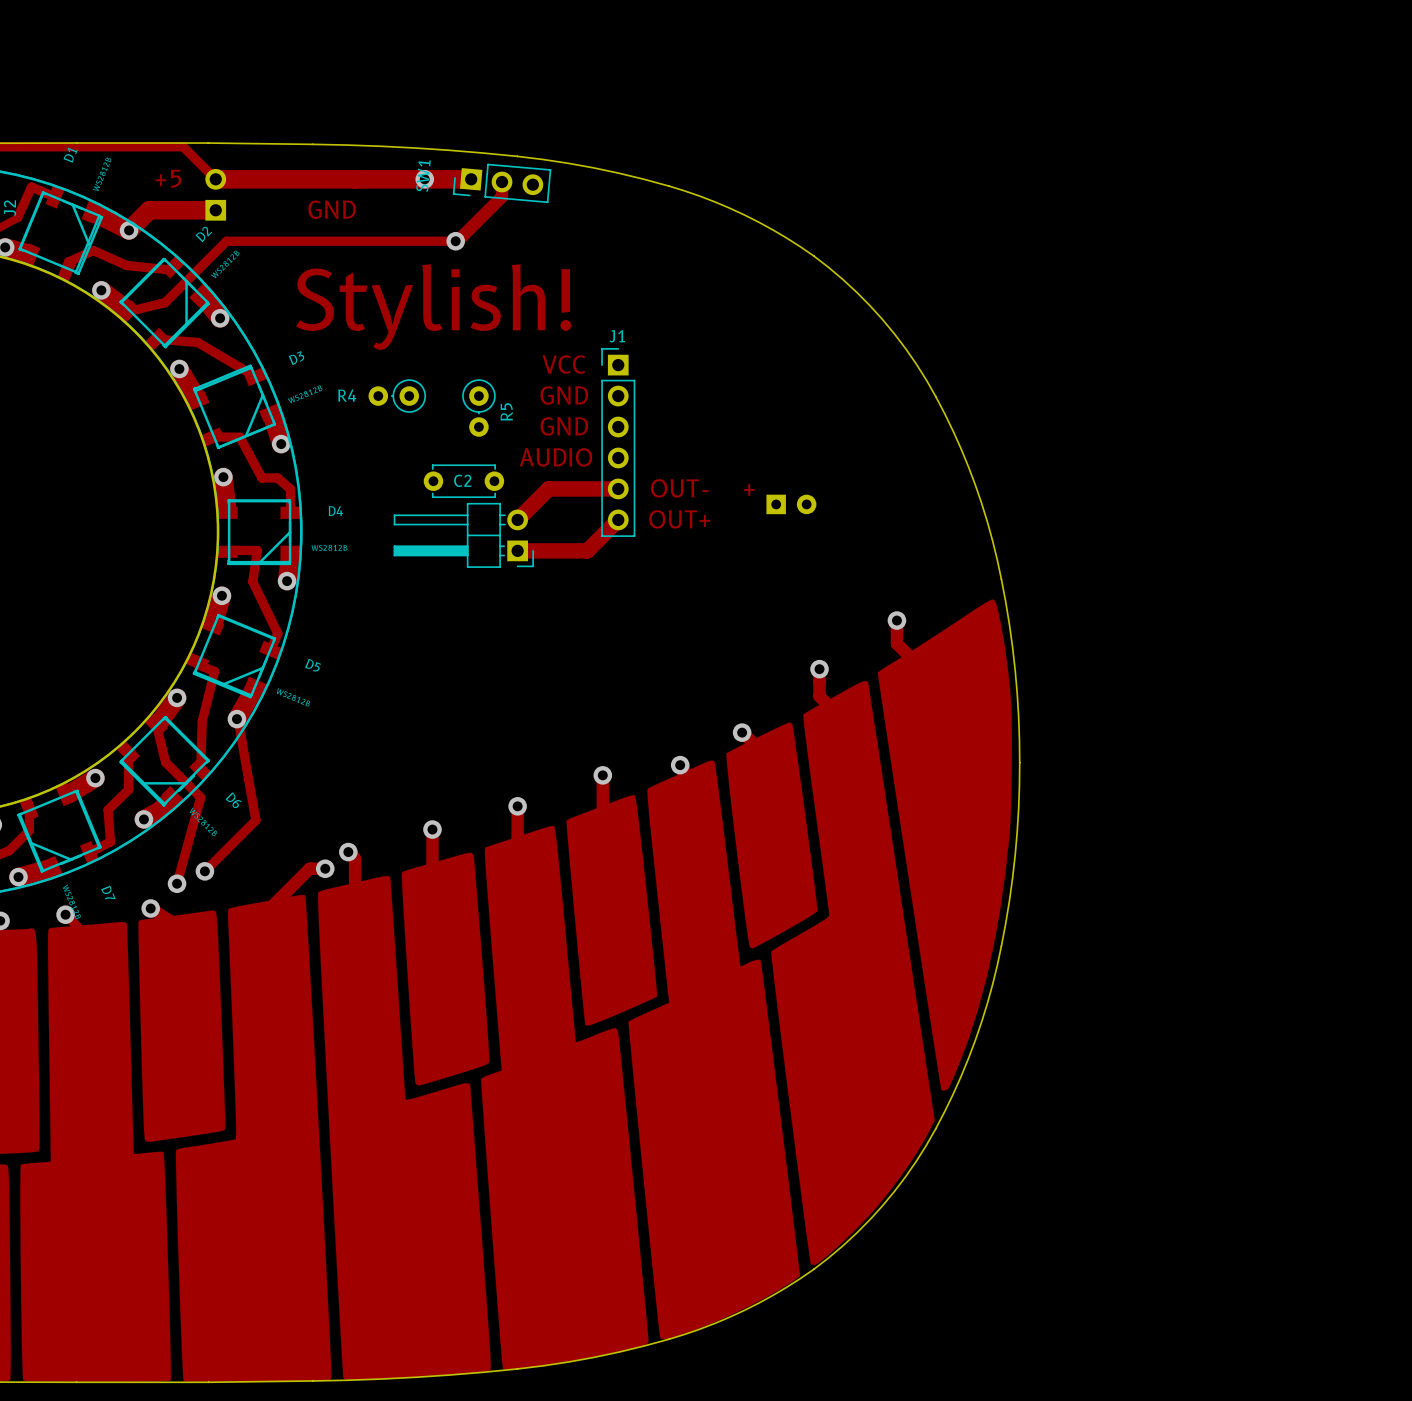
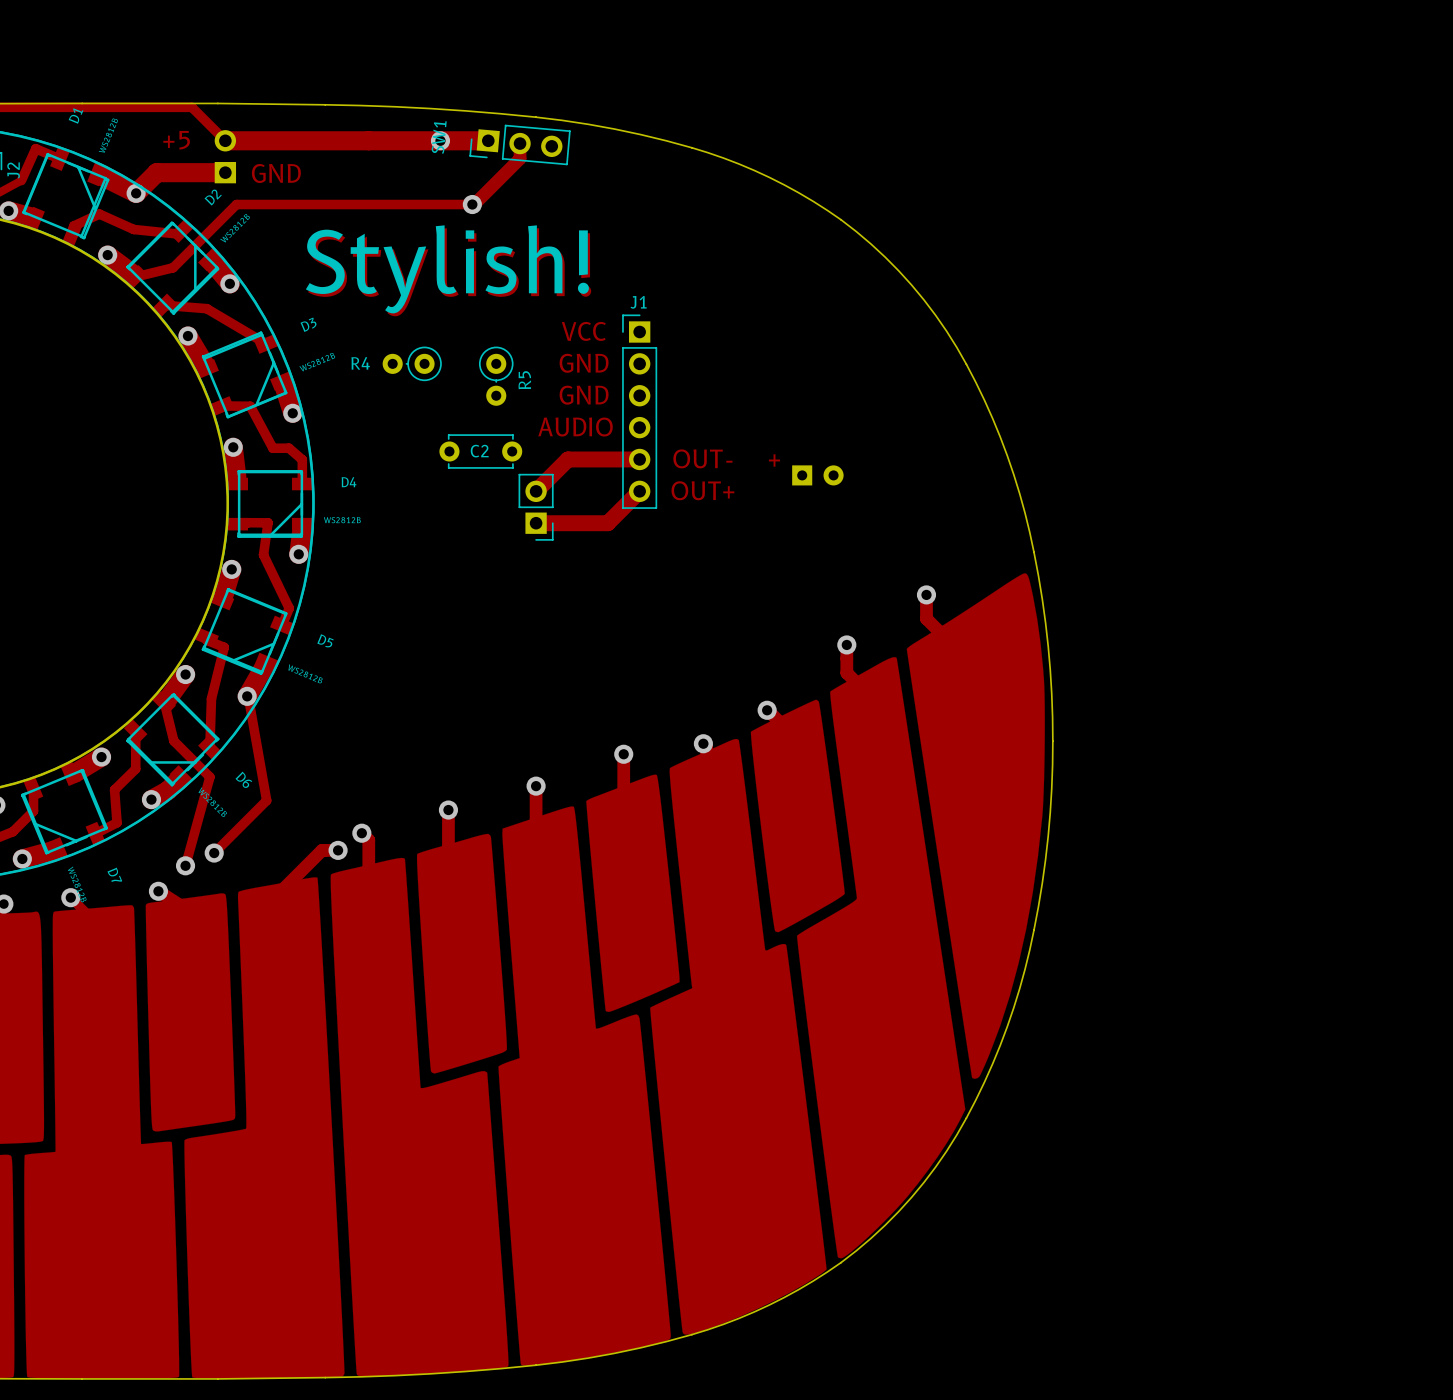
text position: GND (332, 209) -> GND (276, 173)
text: none -> Stylish! (447, 269)
part: (463, 535) -> none
part: none -> (536, 507)

